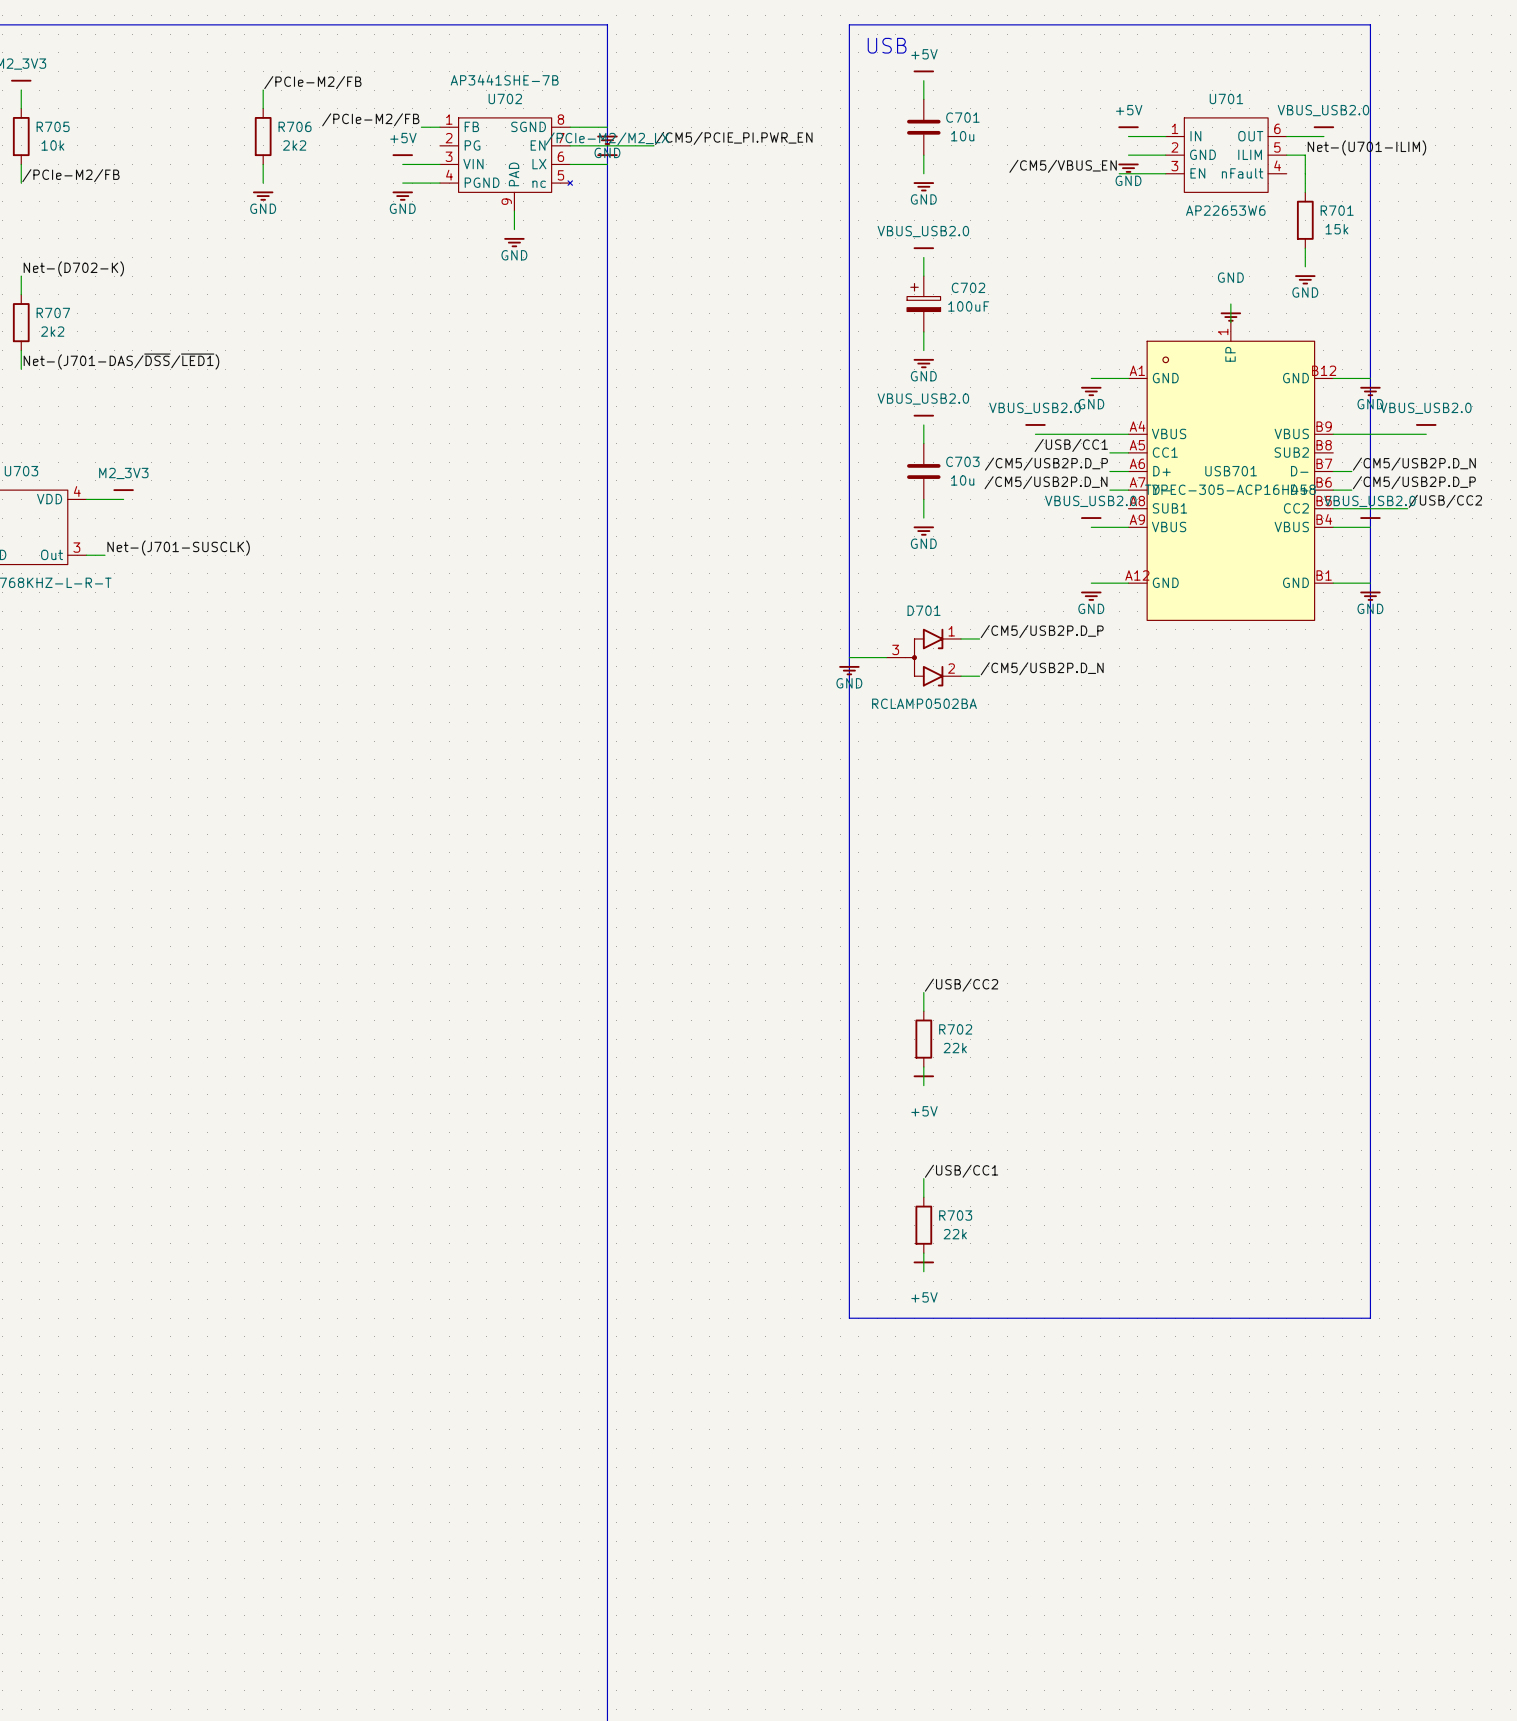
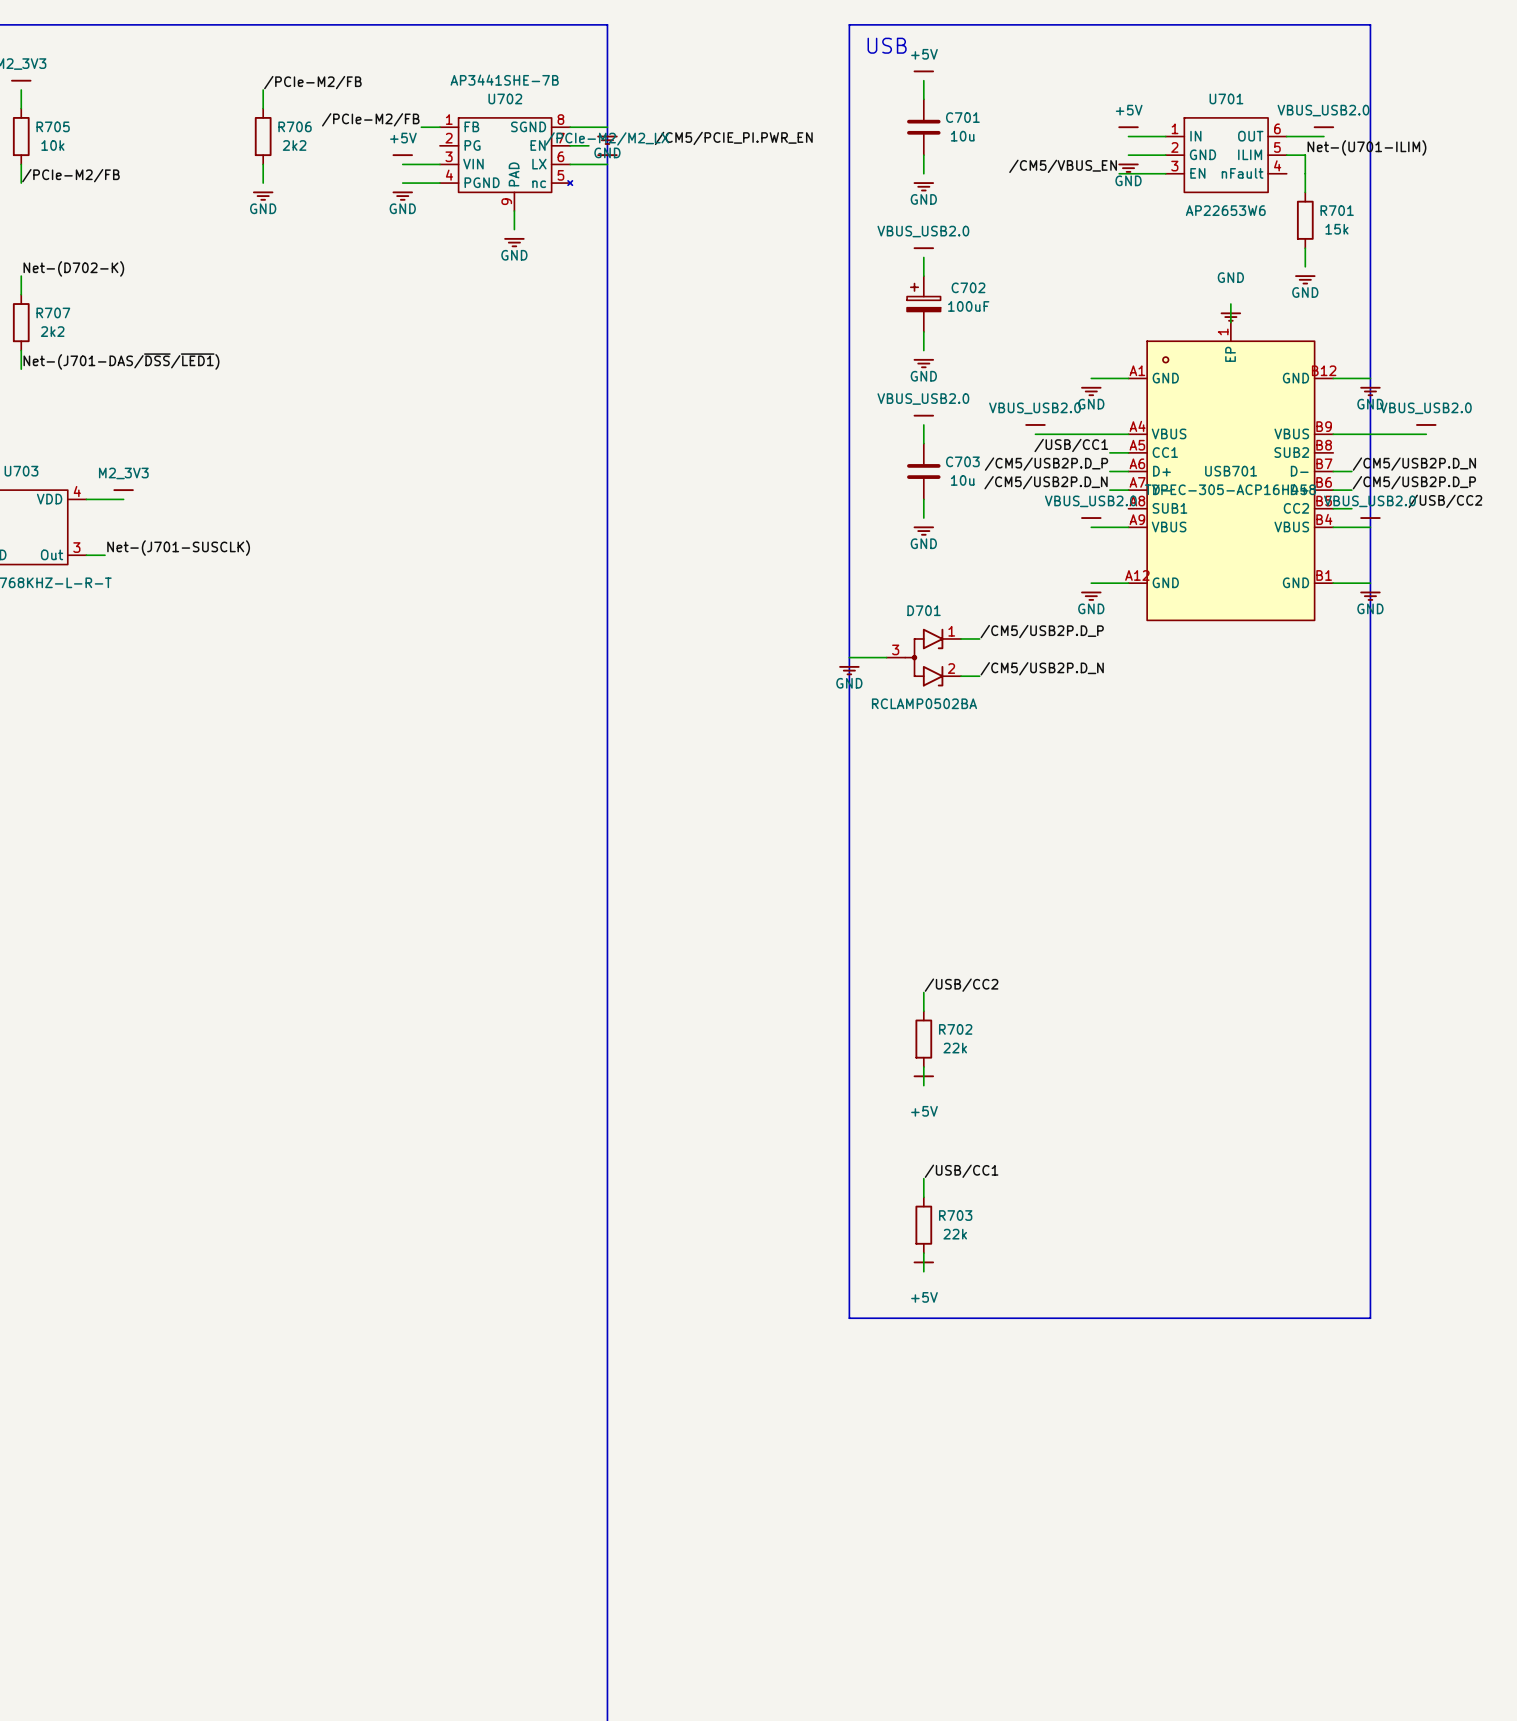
wire: (588, 145) (653, 145) -> none
wire: (1351, 508) (1407, 508) -> none

